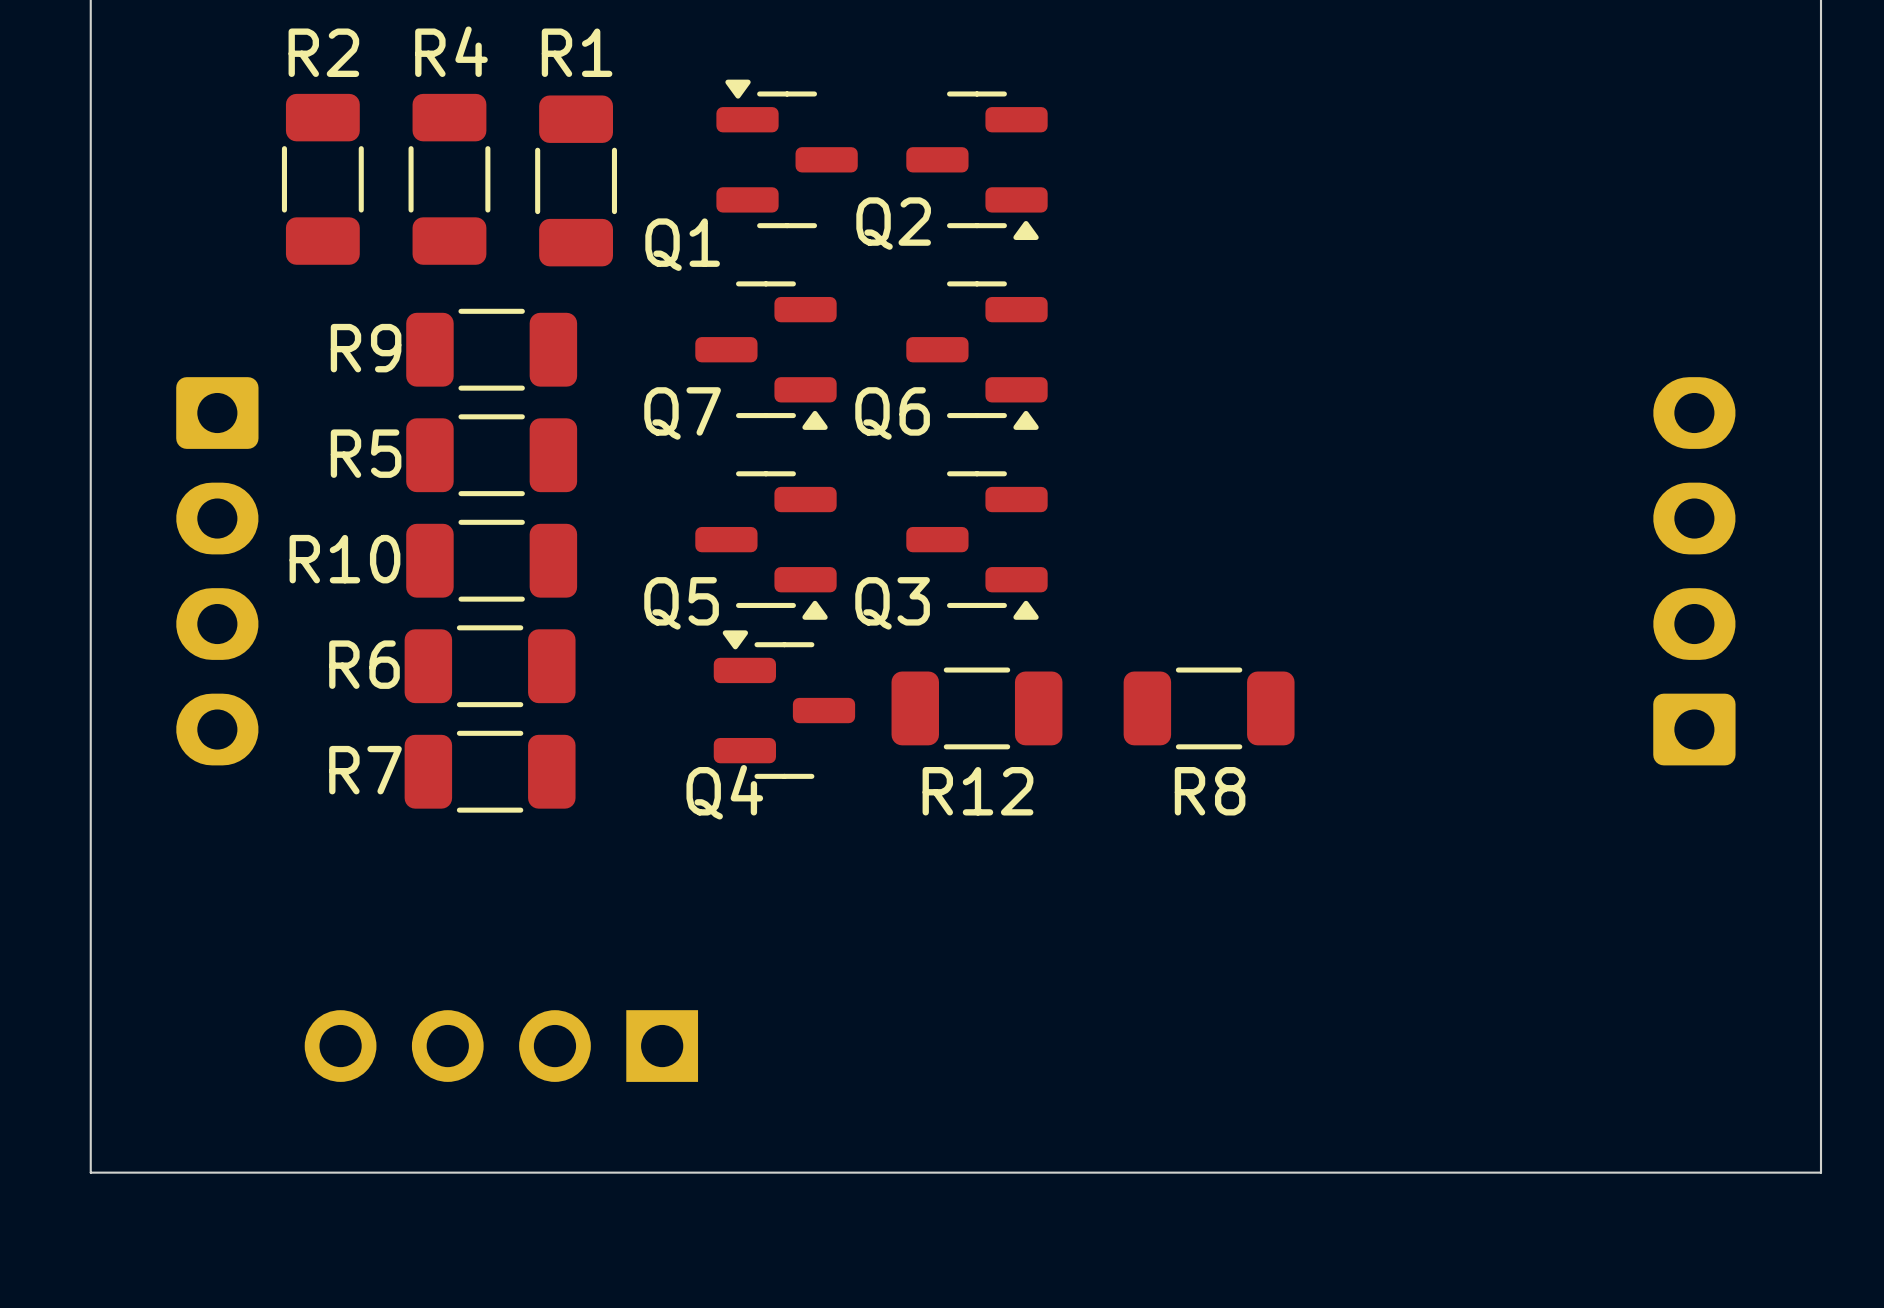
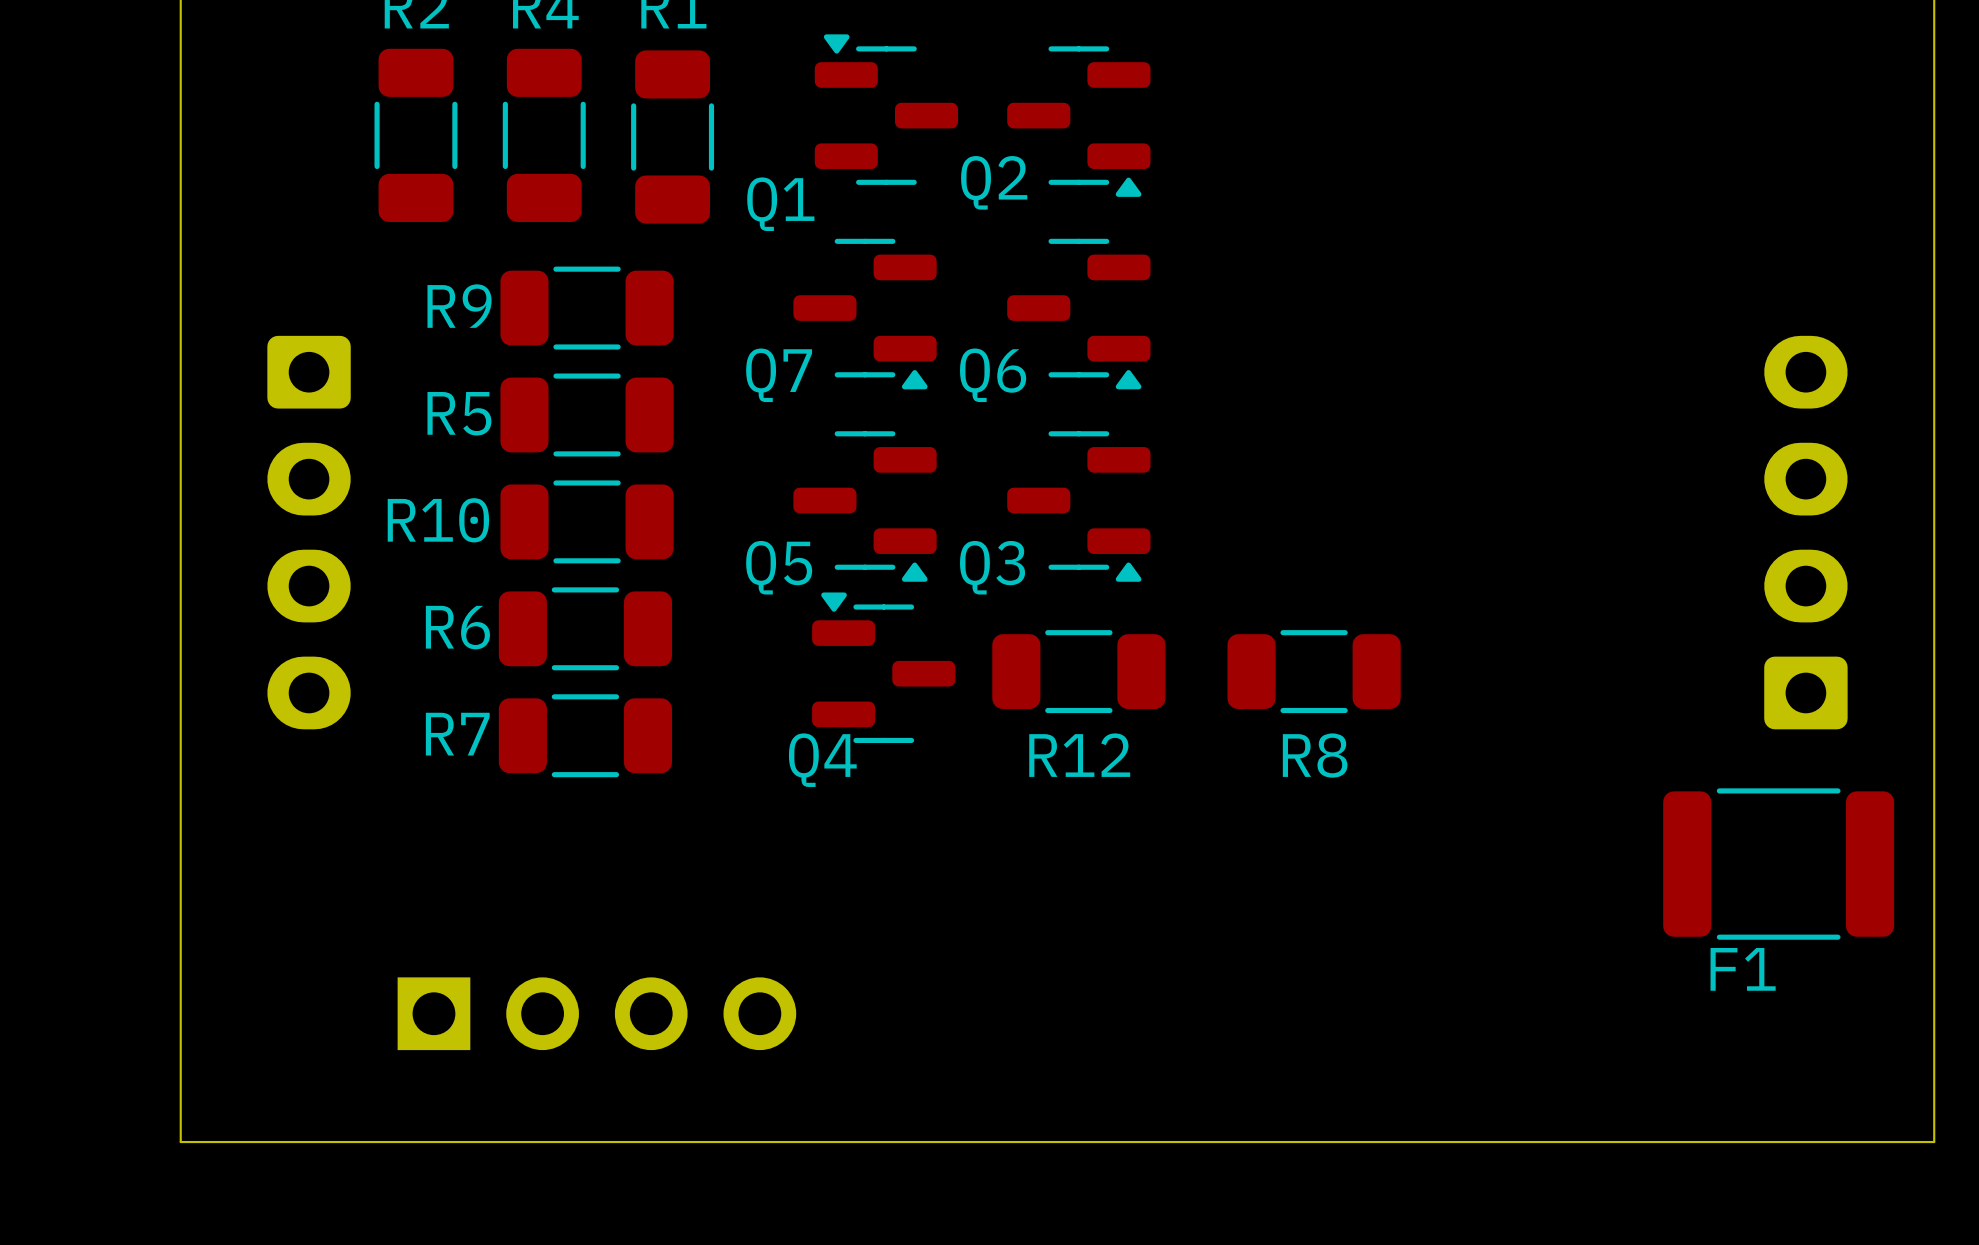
F1: none -> (1778, 864)
part rotation: 0° (501, 1046) -> 180° (596, 1013)

